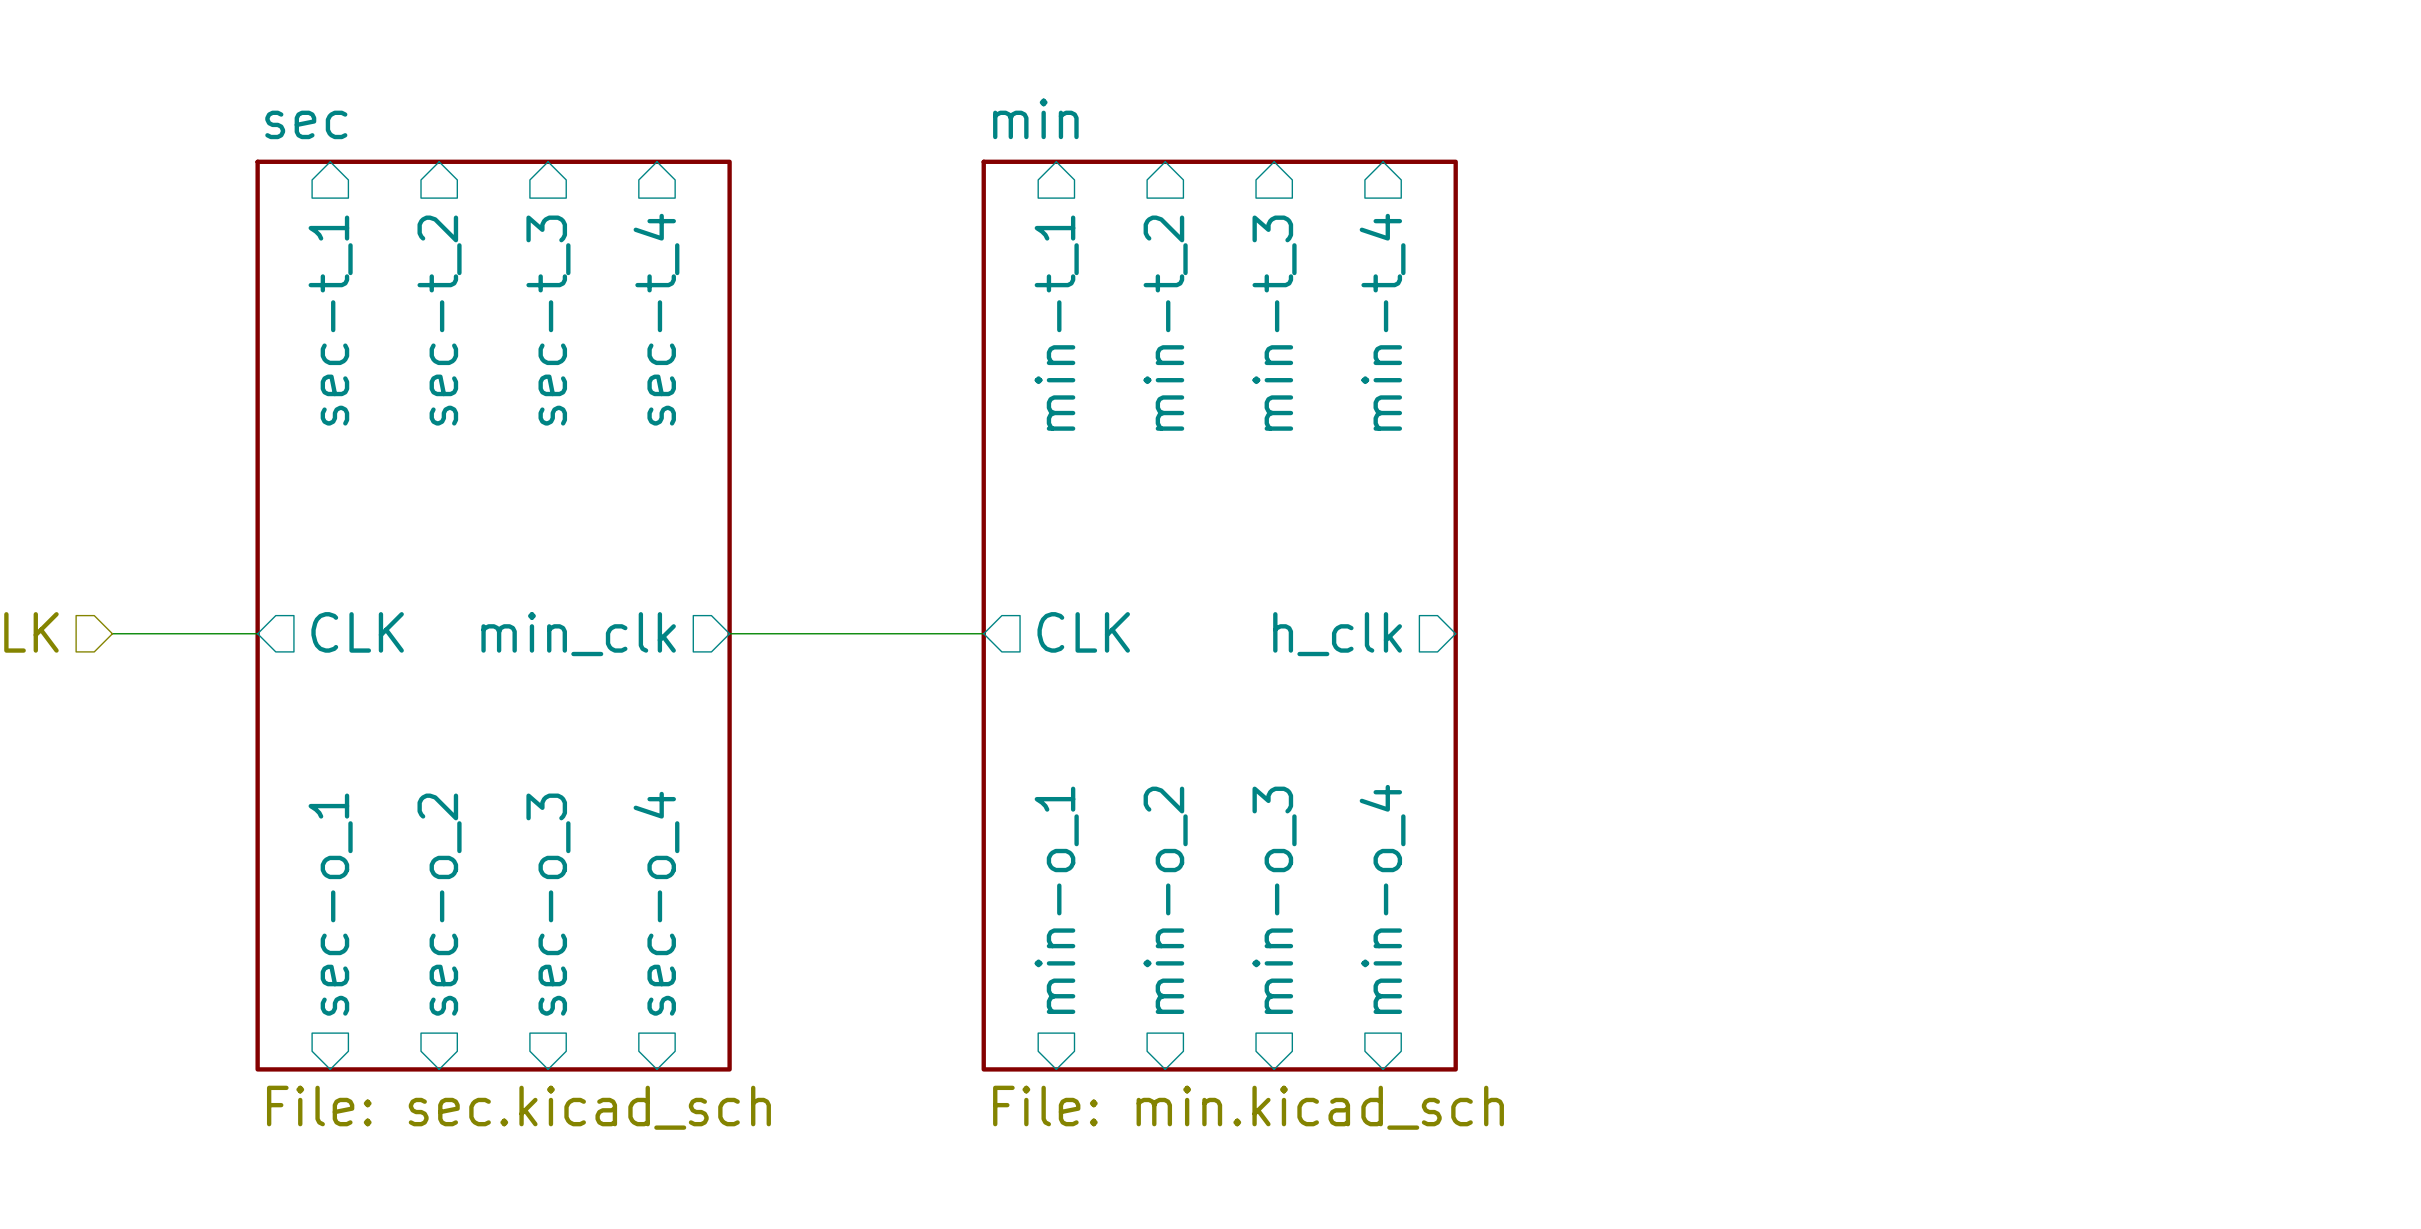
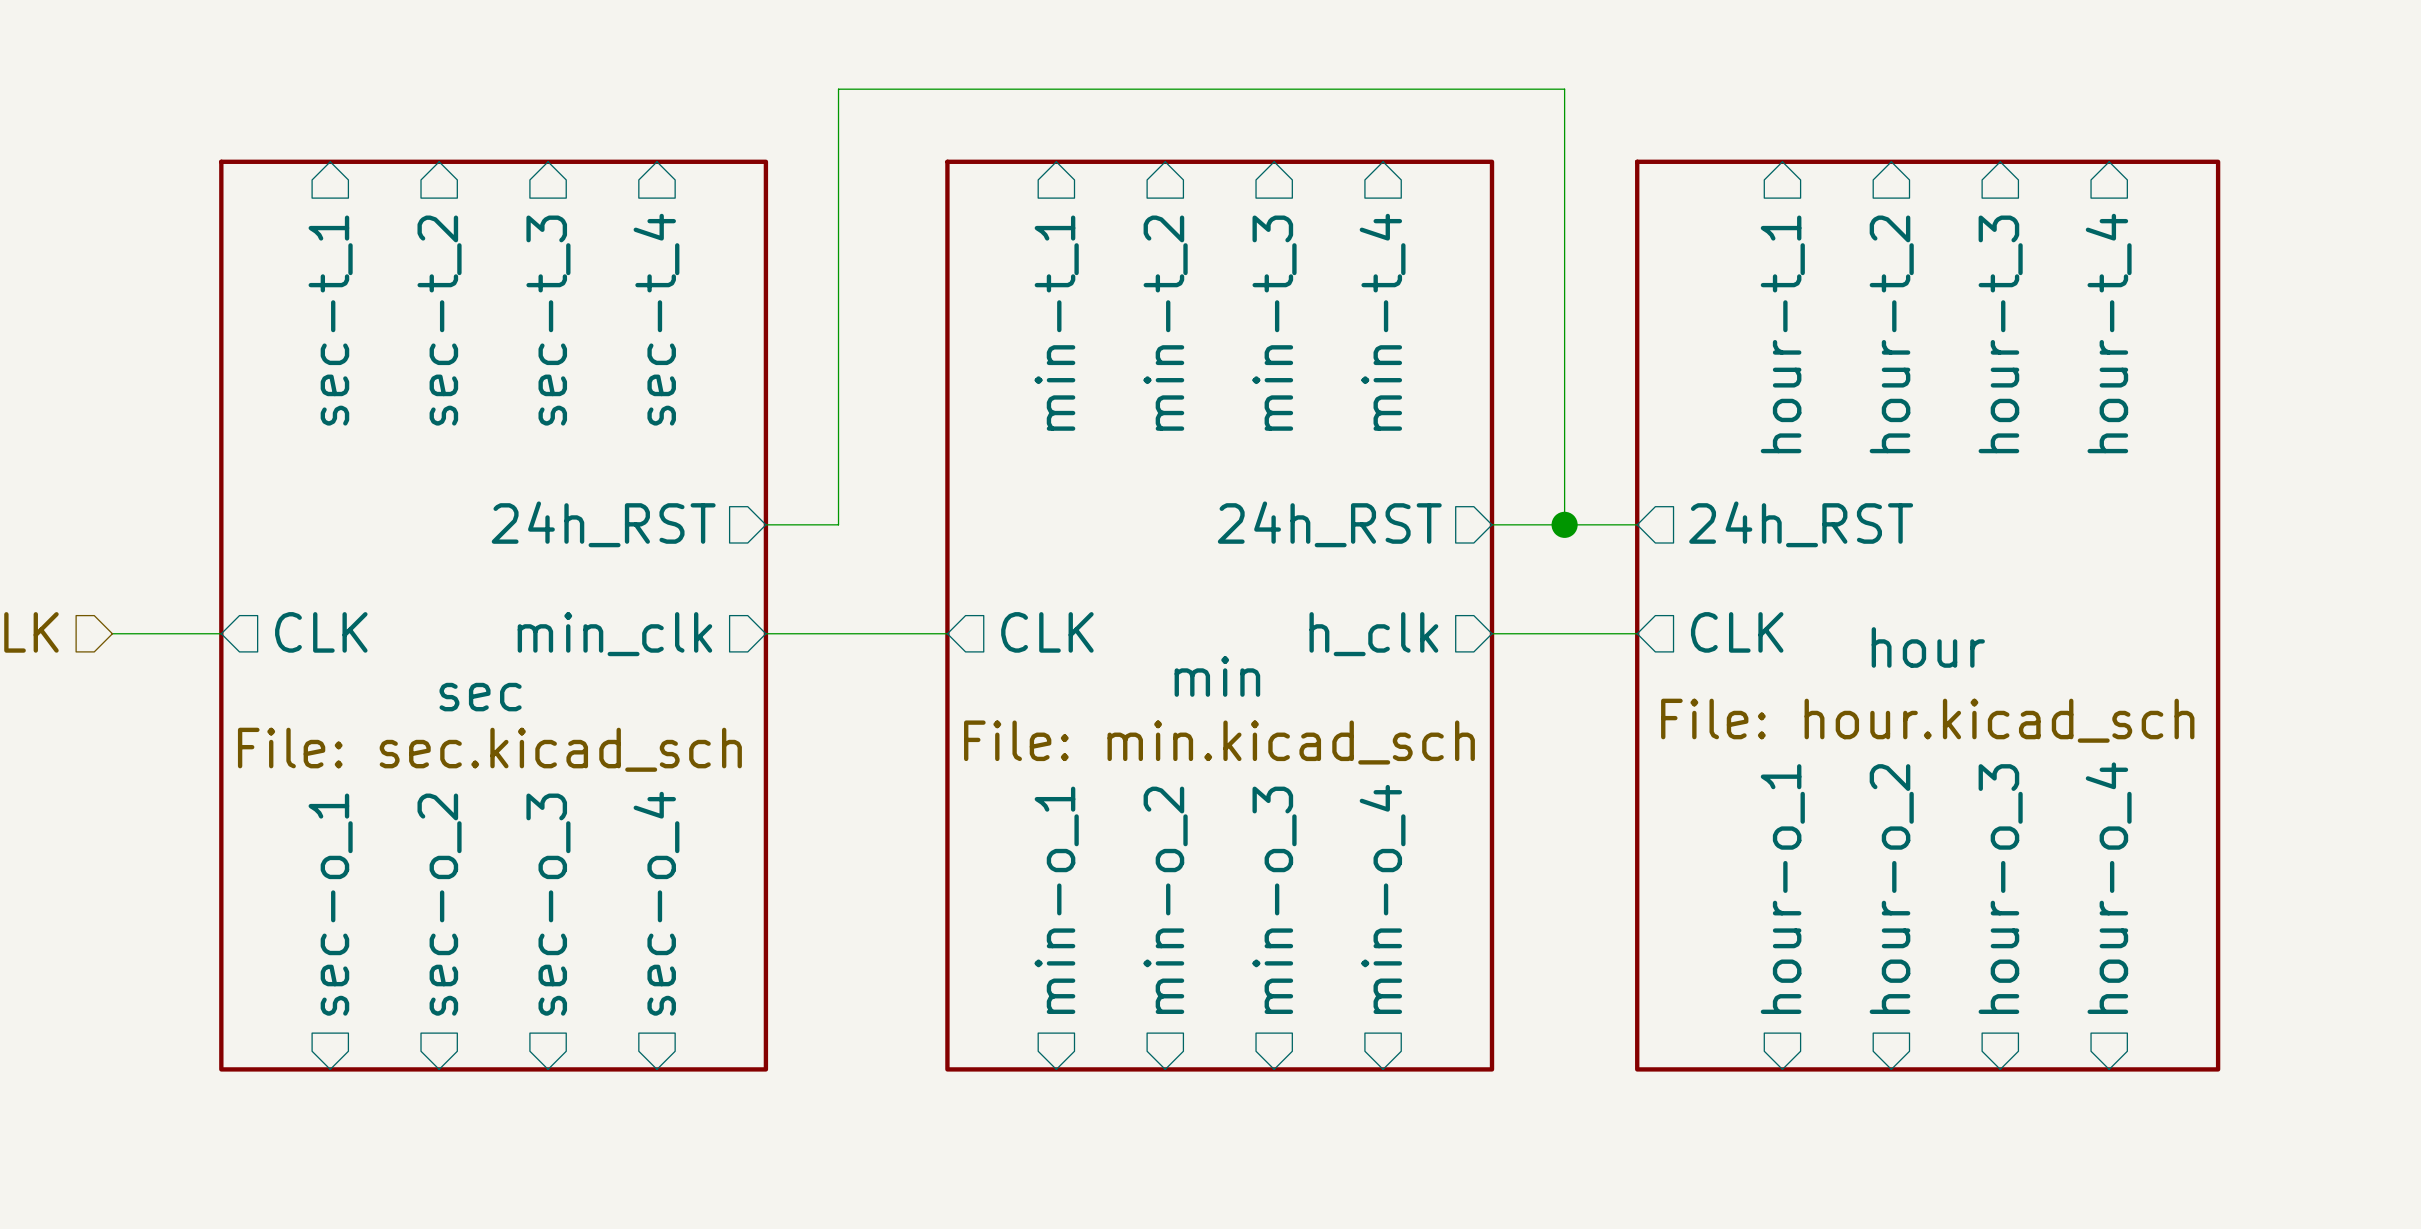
sheet min name position: min (1035, 118) -> min (1217, 676)
sheet sec name position: sec (306, 124) -> sec (480, 697)
sheet sec shape: [255, 159, 732, 1072] -> [219, 159, 769, 1072]
sheet min shape: [981, 159, 1458, 1072] -> [945, 159, 1495, 1072]
sheet pin: none -> hour-t_4 (2108, 333)
sheet pin: none -> hour-t_1 (1782, 334)
sheet pin: none -> hour-t_2 (1891, 334)
sheet pin: none -> hour-t_3 (2000, 334)
sheet pin: none -> 24h_RST (603, 524)
wire: none -> (765, 524) (838, 524) (838, 89) (1564, 89) (1564, 524)
sheet pin: none -> 24h_RST (1329, 524)
wire: none -> (1492, 524) (1637, 524)
junction: none -> (1564, 524)
sheet pin: none -> 24h_RST (1801, 524)
sheet hour: none -> File: hour.kicad_sch (1927, 615)
sheet pin position: CLK (357, 632) -> CLK (321, 632)
sheet pin position: CLK (1083, 632) -> CLK (1047, 632)
sheet pin: none -> CLK (1737, 632)
wire: (221, 633) (257, 633) -> none
wire: (729, 633) (765, 633) -> none
wire: (947, 633) (983, 633) -> none
wire: none -> (1492, 633) (1637, 633)
sheet pin position: min_clk (578, 634) -> min_clk (614, 634)
sheet pin position: h_clk (1337, 634) -> h_clk (1373, 634)
sheet pin: none -> hour-o_4 (2108, 888)
sheet pin: none -> hour-o_1 (1782, 889)
sheet pin: none -> hour-o_2 (1891, 889)
sheet pin: none -> hour-o_3 (2000, 889)
sheet sec value position: File: sec.kicad_sch (518, 1107) -> File: sec.kicad_sch (489, 749)
sheet min value position: File: min.kicad_sch (1248, 1107) -> File: min.kicad_sch (1219, 742)

